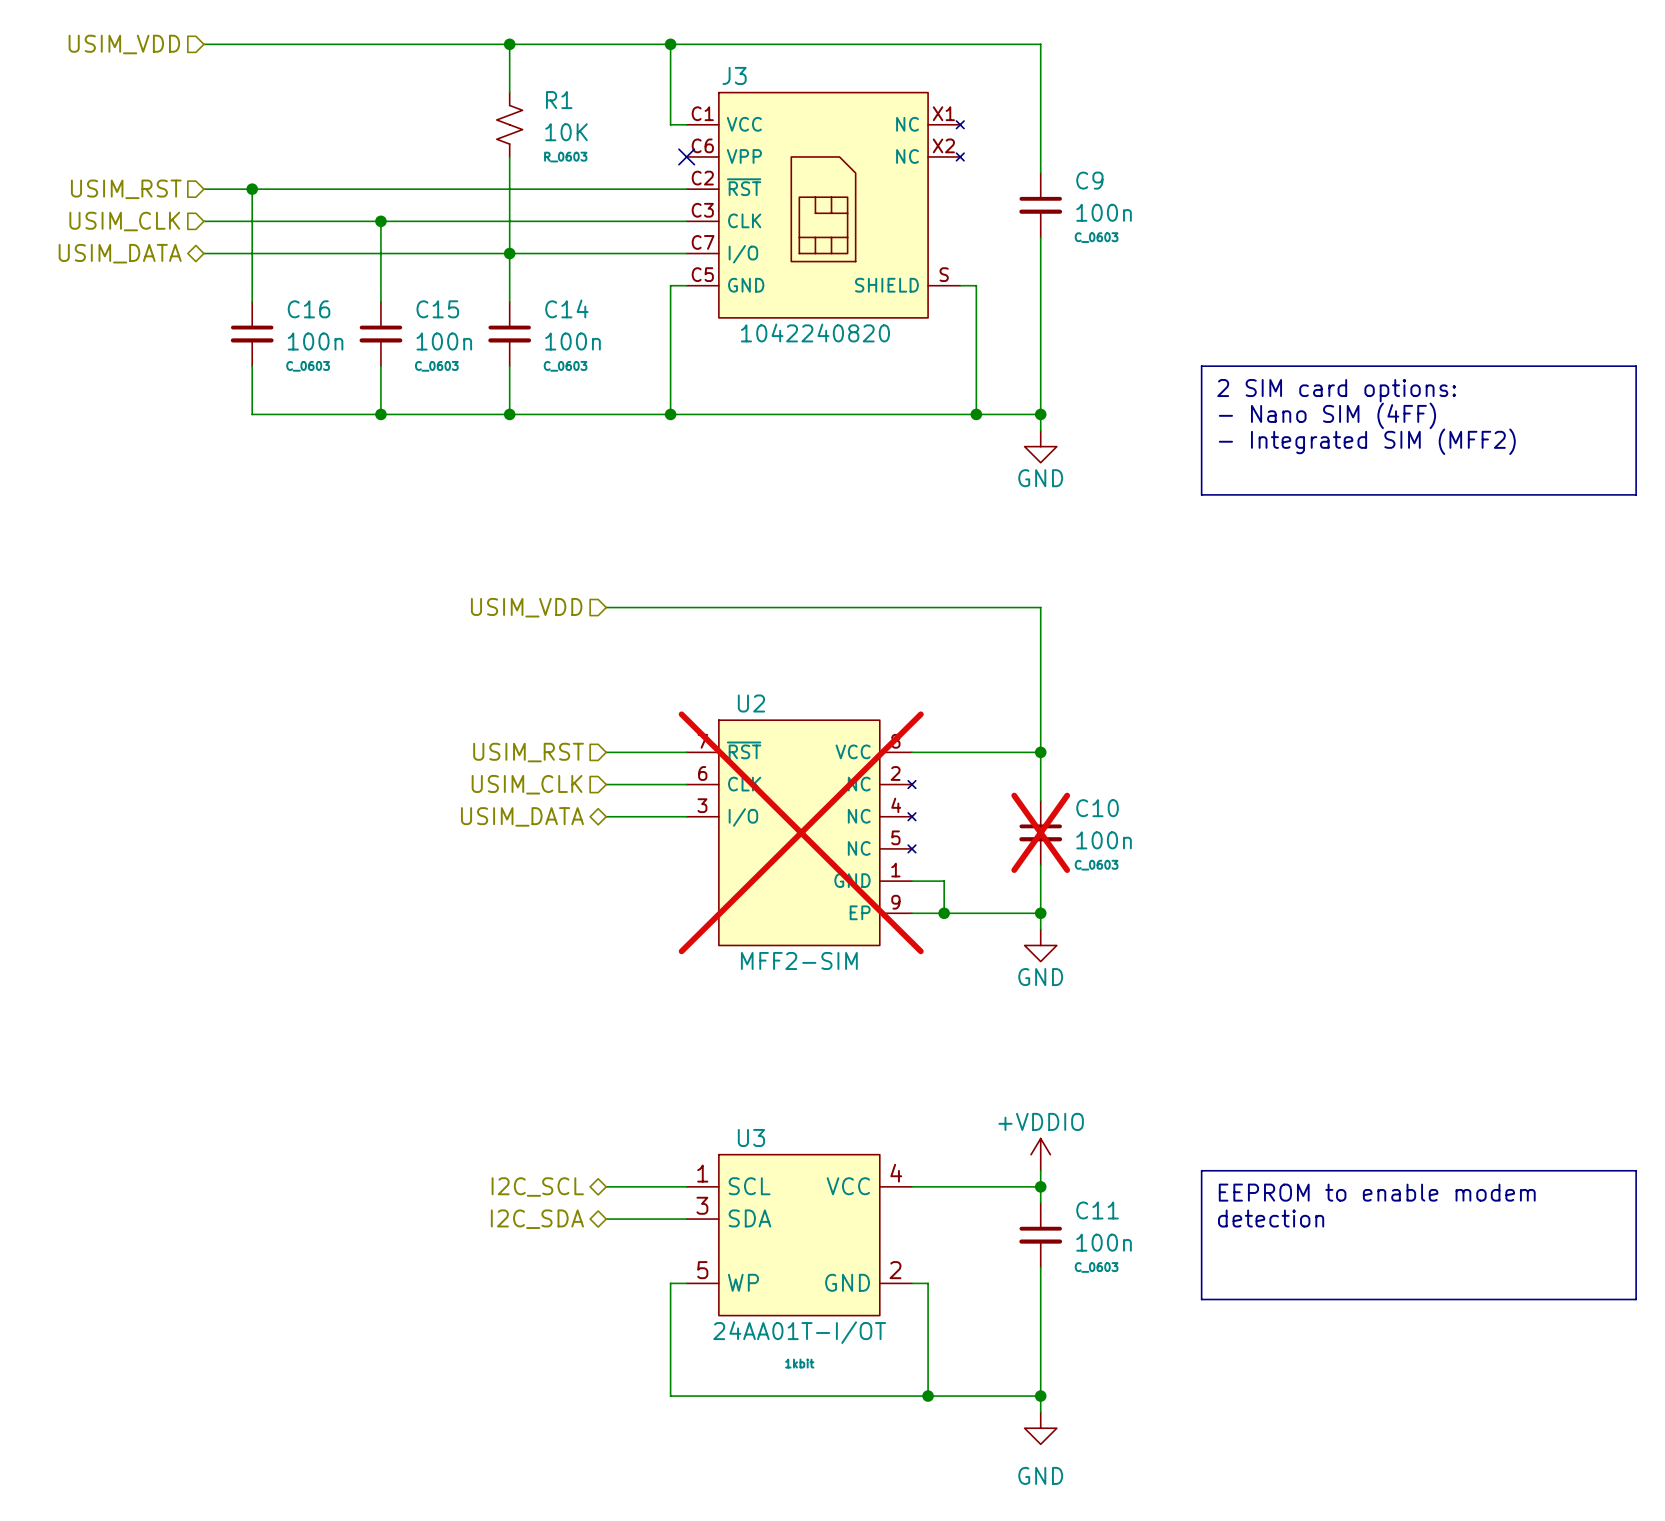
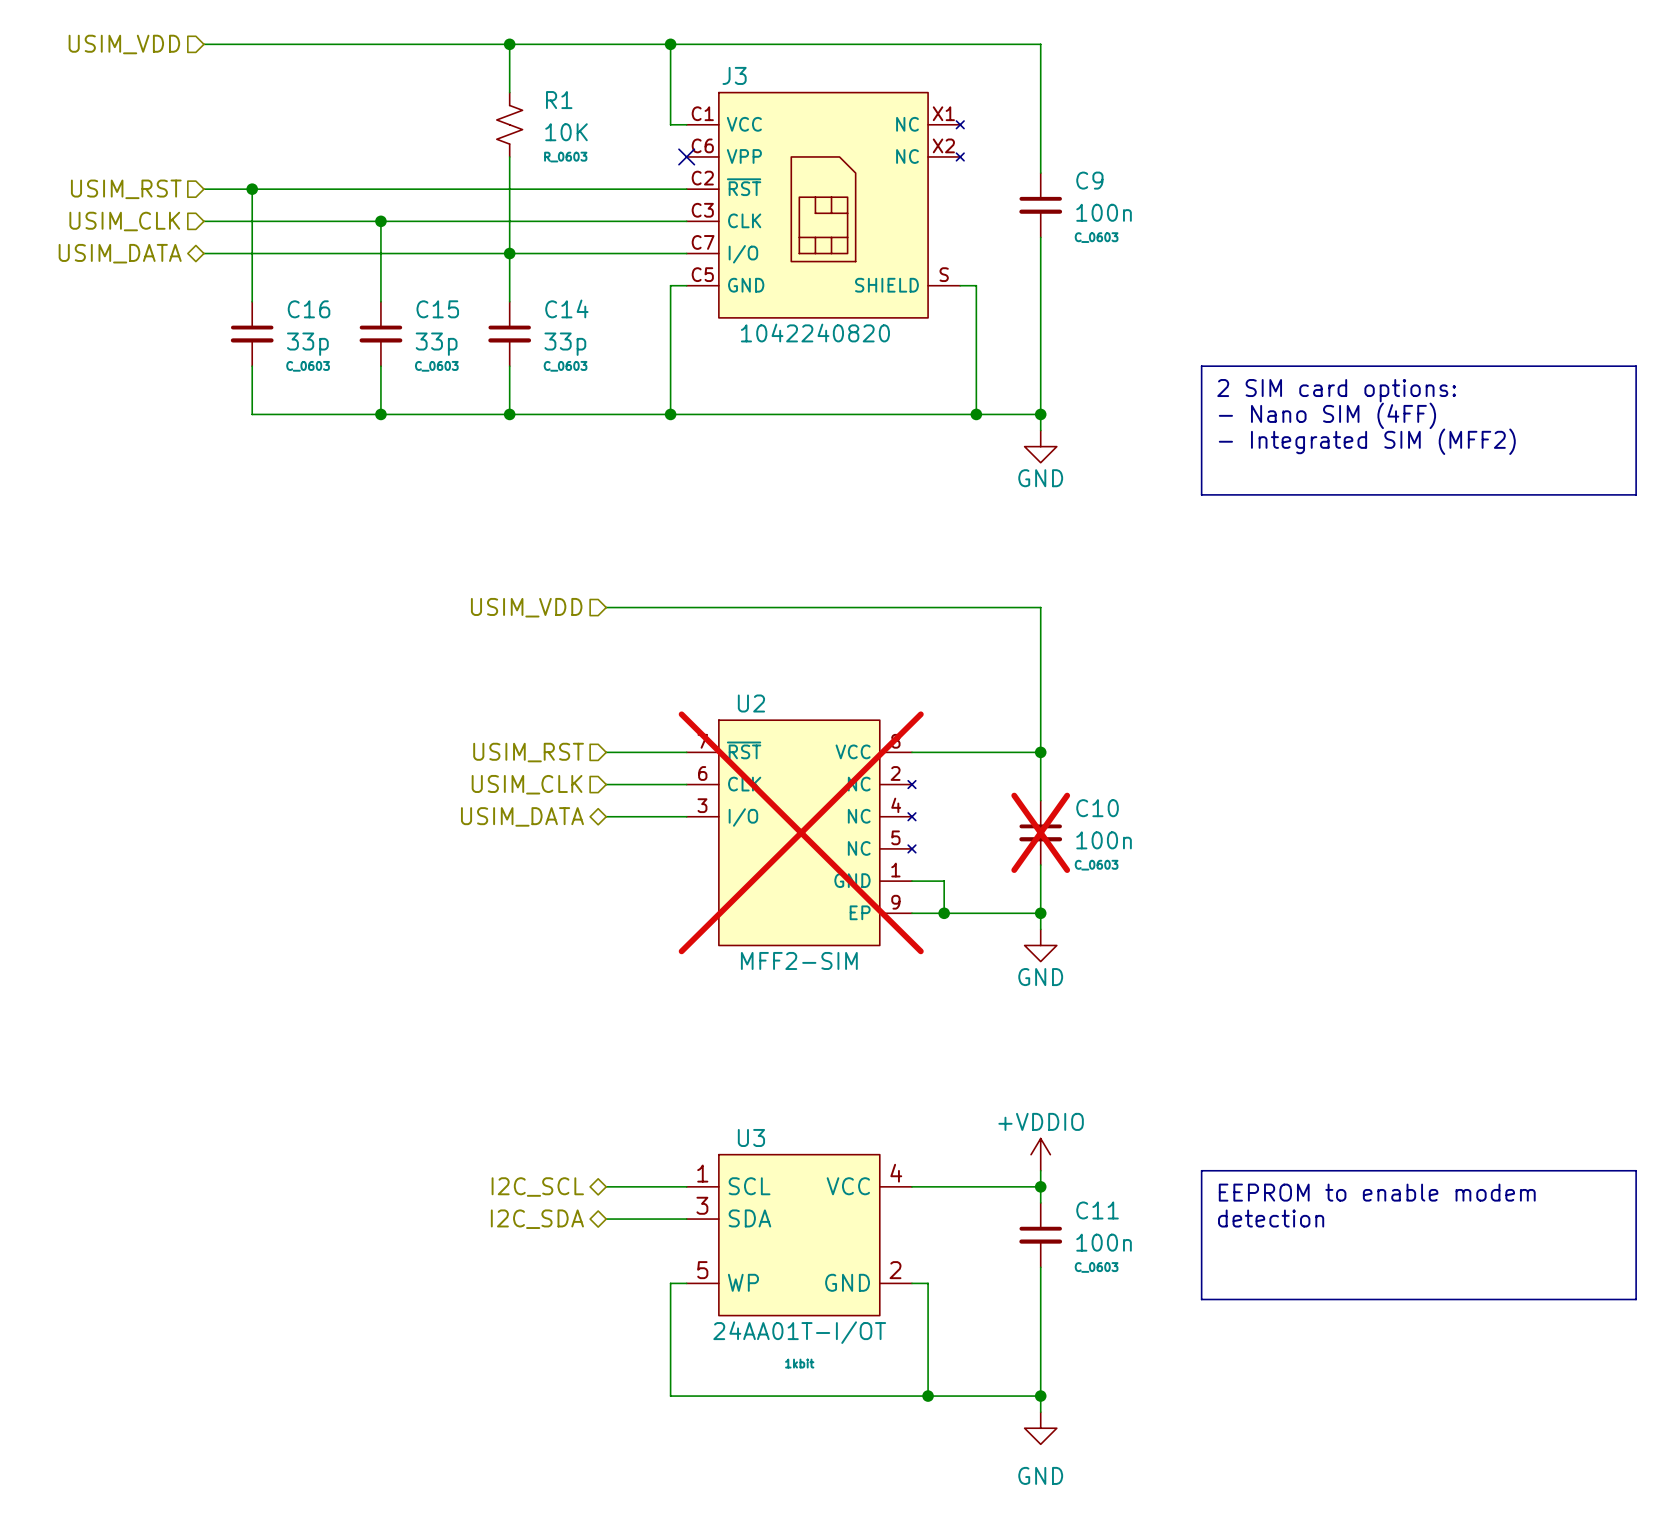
C16 value: 100n (315, 341) -> 33p (307, 344)
C15 value: 100n (444, 341) -> 33p (436, 344)
C14 value: 100n (573, 341) -> 33p (565, 344)

